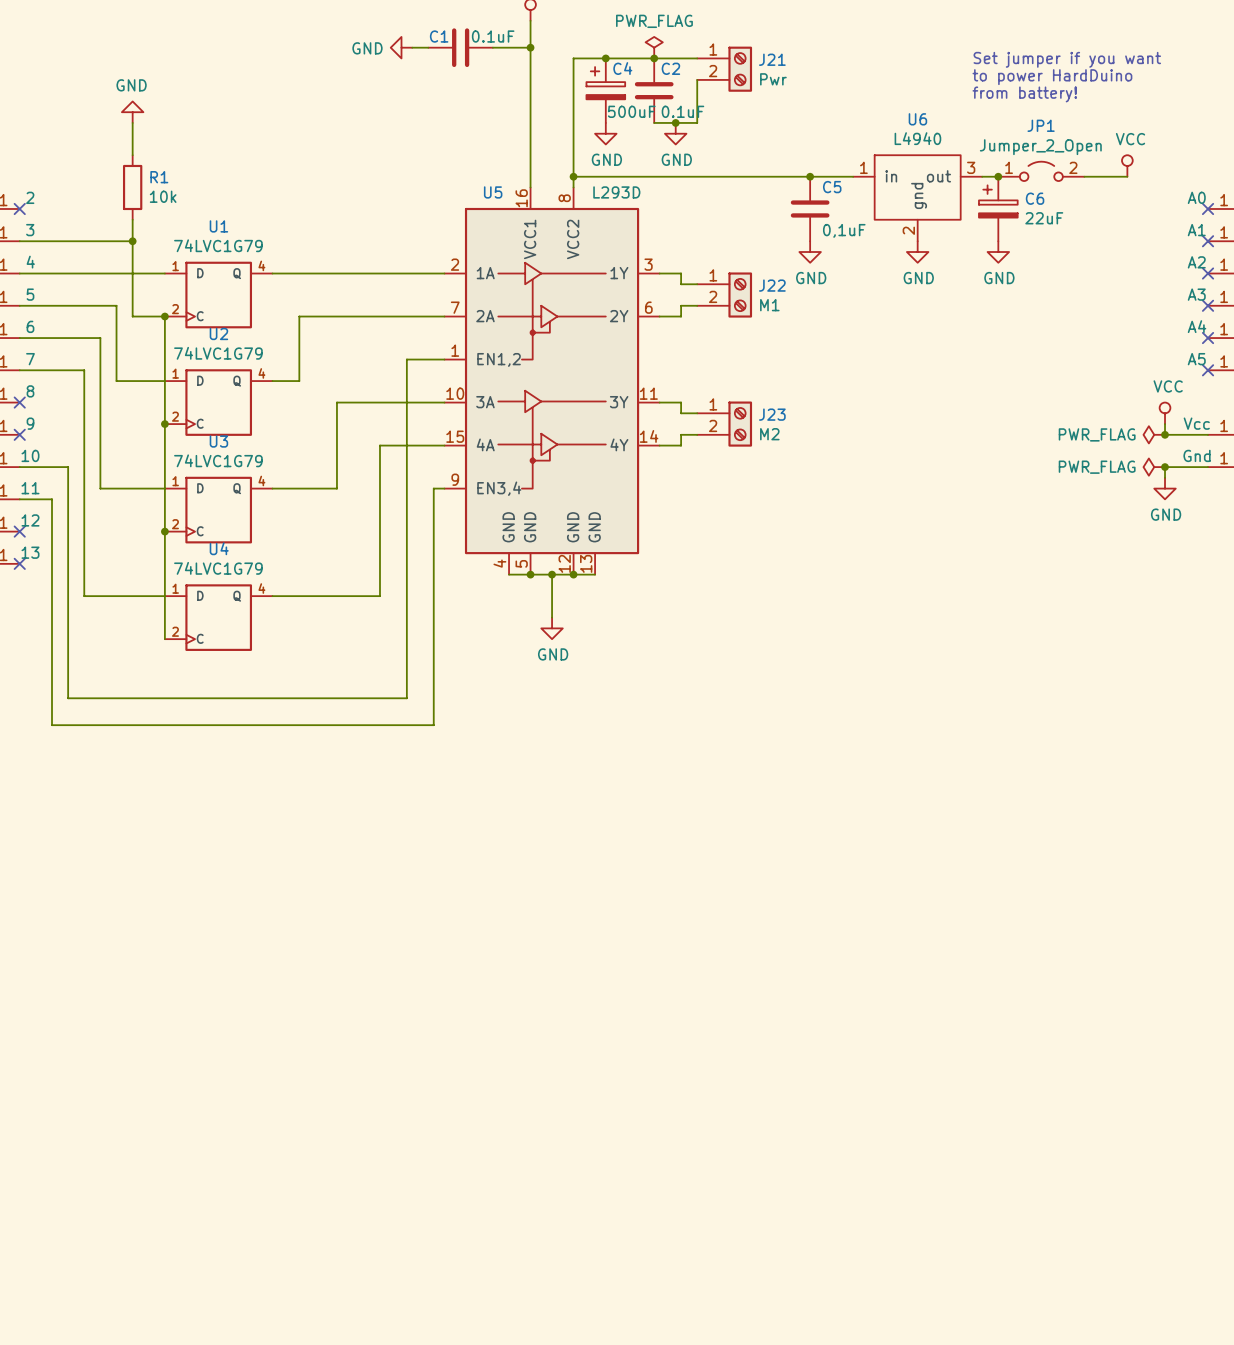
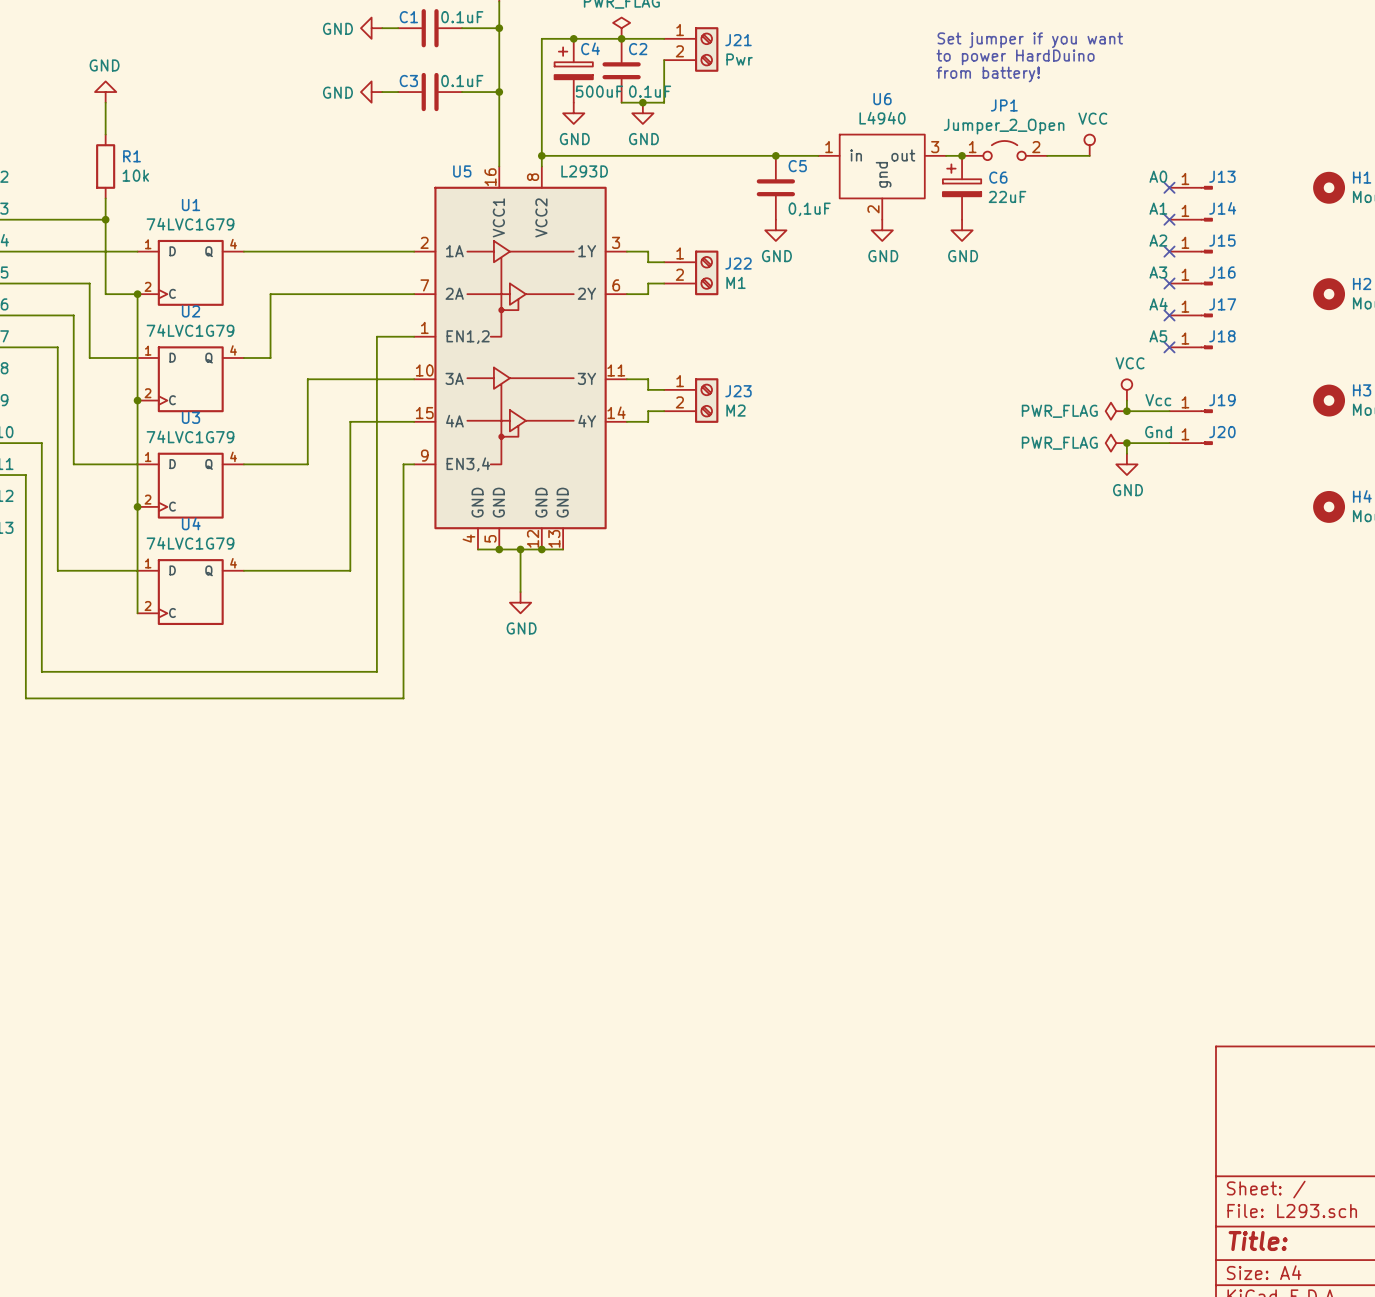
power symbol: none -> GND (371, 92)
wire: none -> (382, 92) (398, 92)
C3: none -> 0.1uF (430, 92)
wire: none -> (462, 92) (499, 92)
junction: none -> (499, 92)

